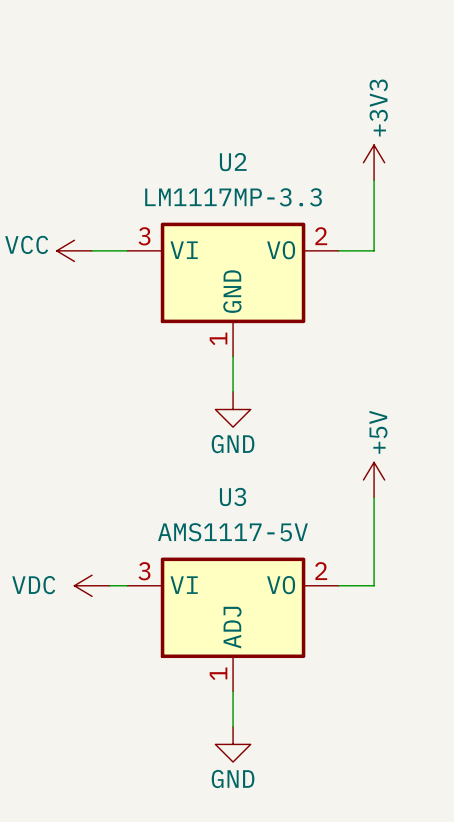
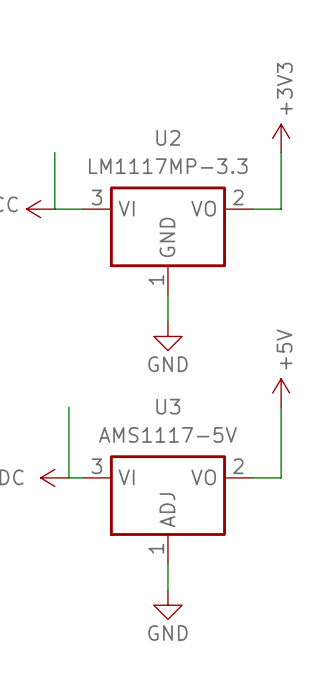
wire: none -> (54, 152) (54, 209)
wire: none -> (68, 407) (68, 477)

